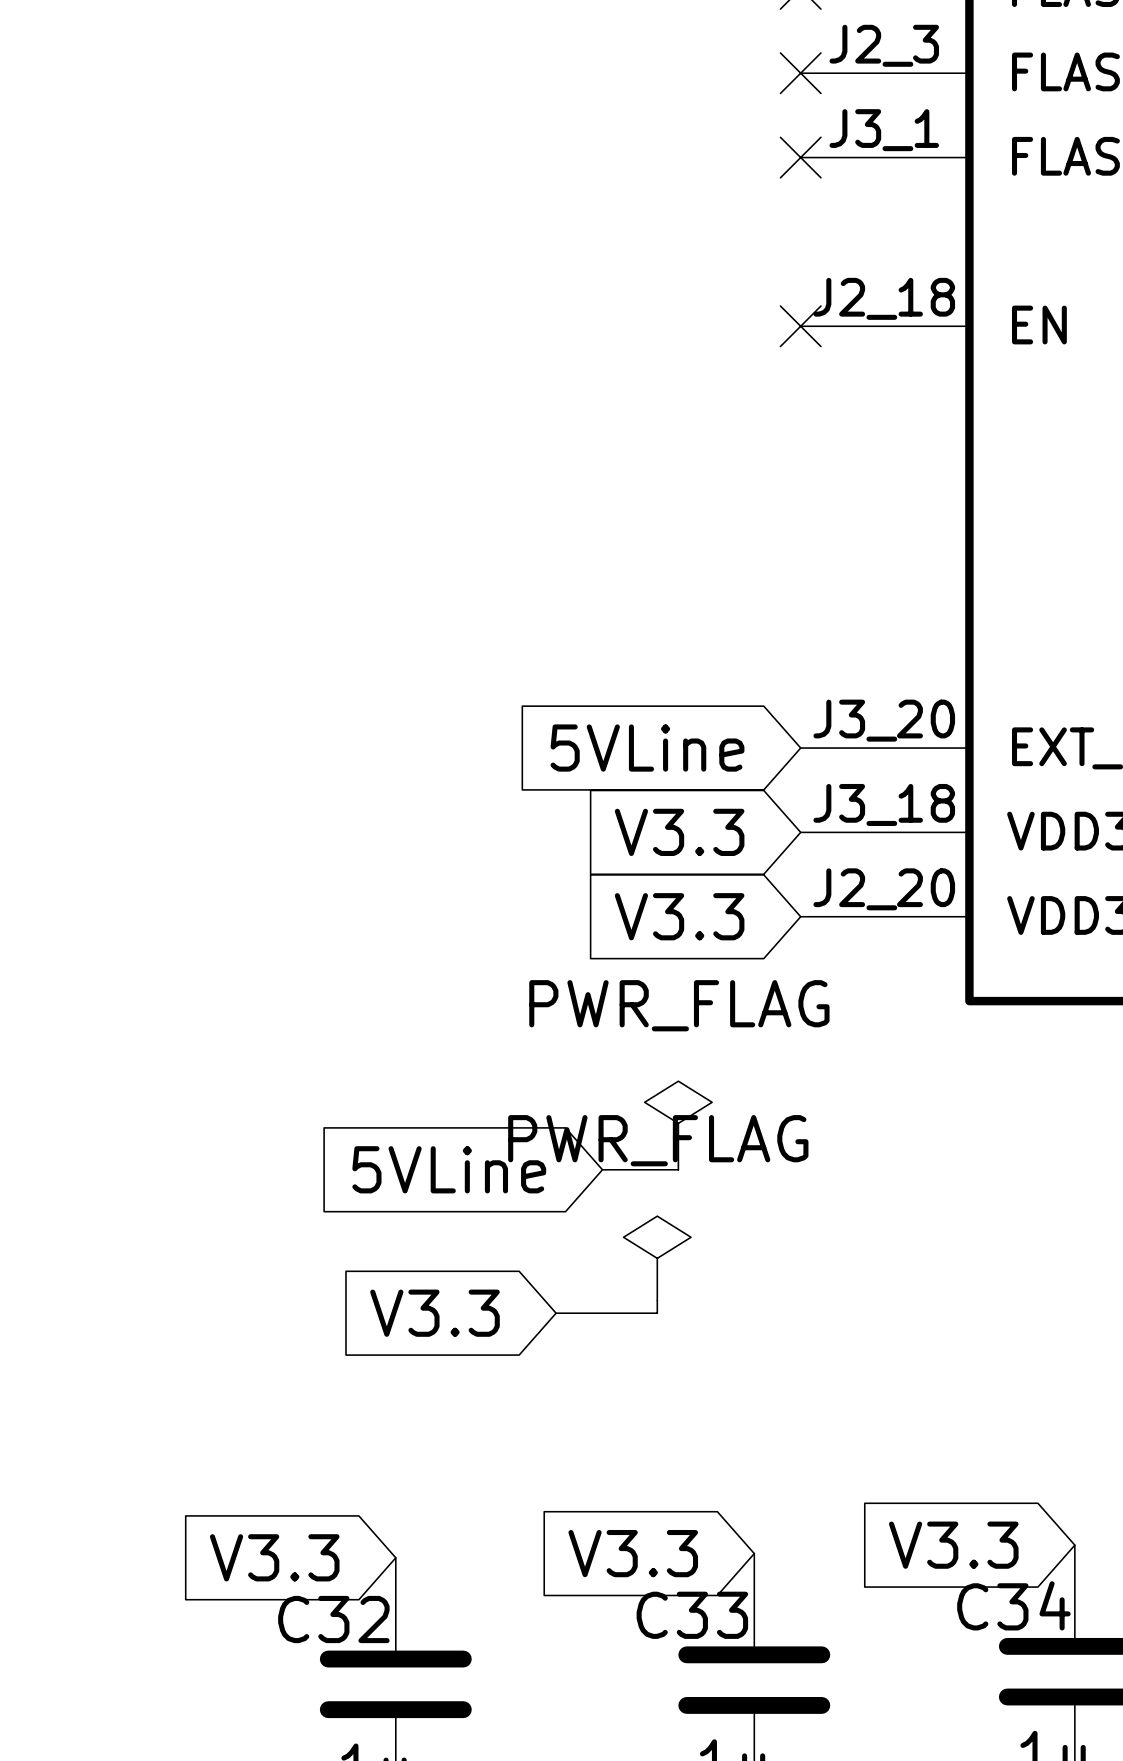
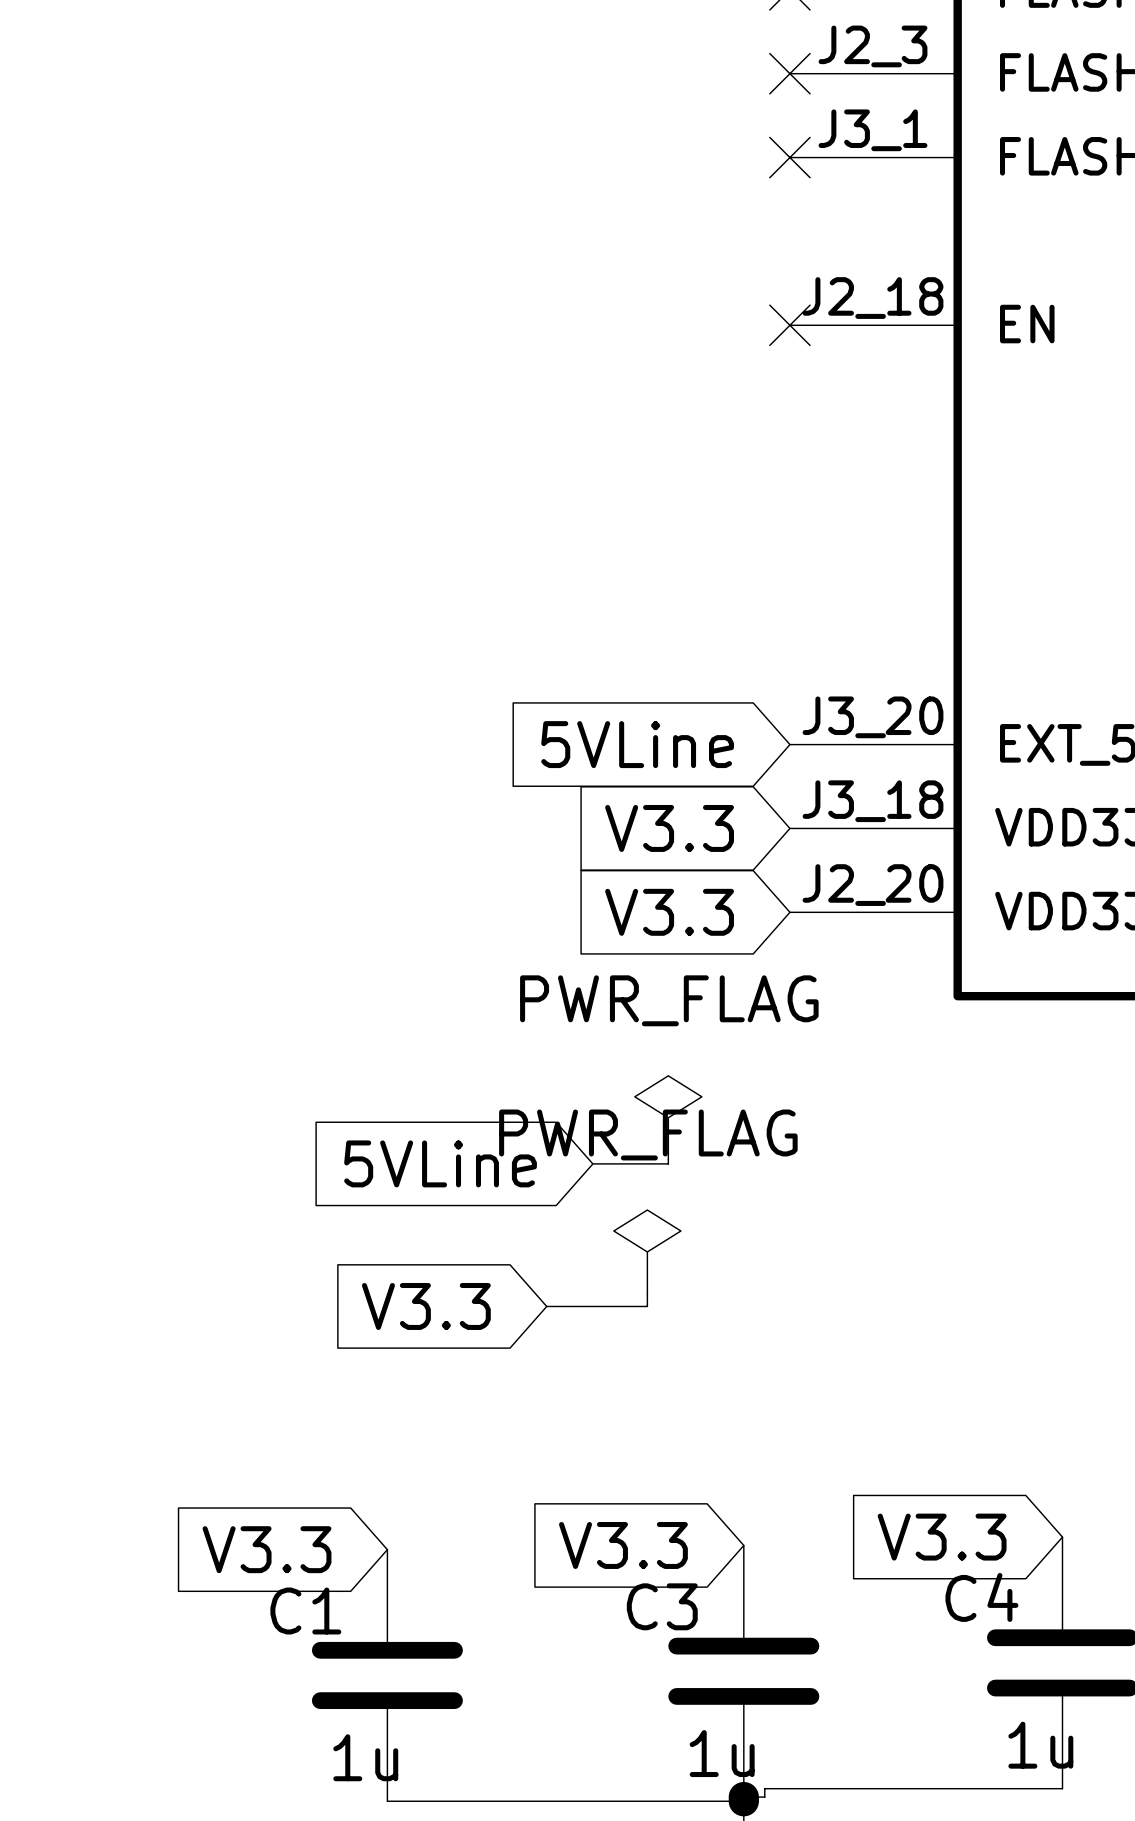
C34 name: C34 (1013, 1605) -> C4 (981, 1597)
C33 name: C33 (692, 1615) -> C3 (662, 1606)
C32 name: C32 (333, 1619) -> C1 (305, 1611)

